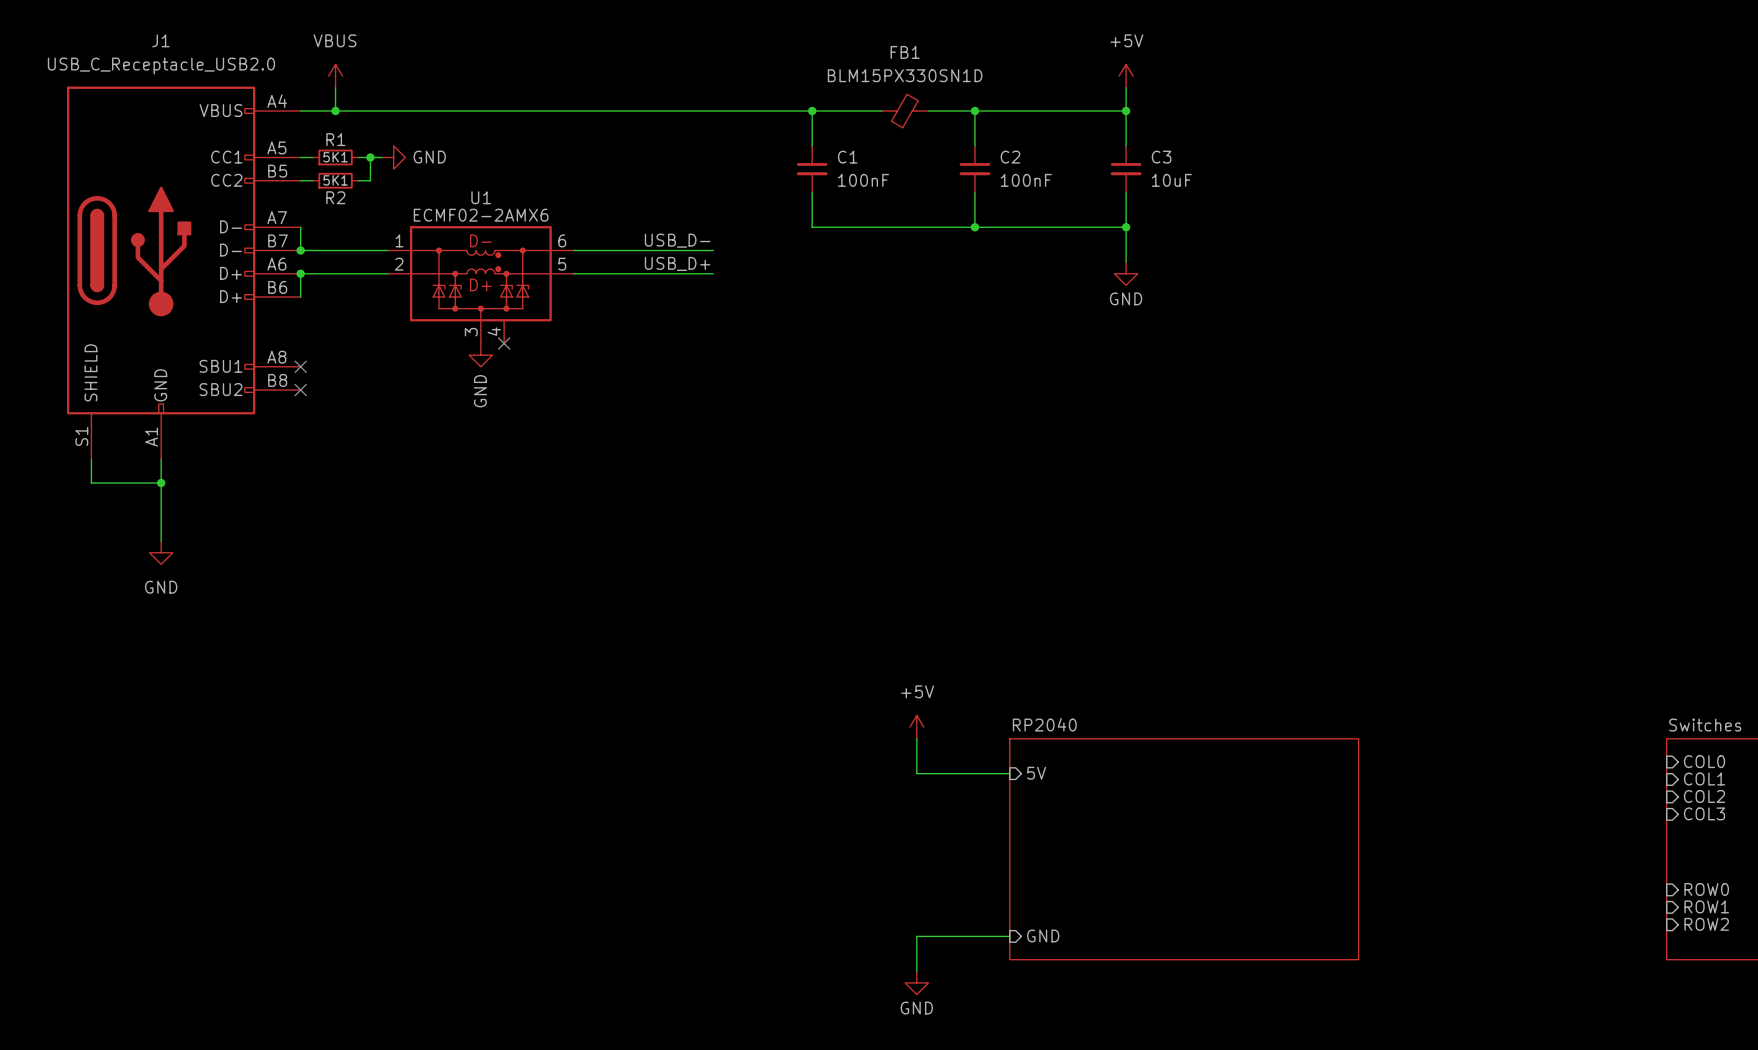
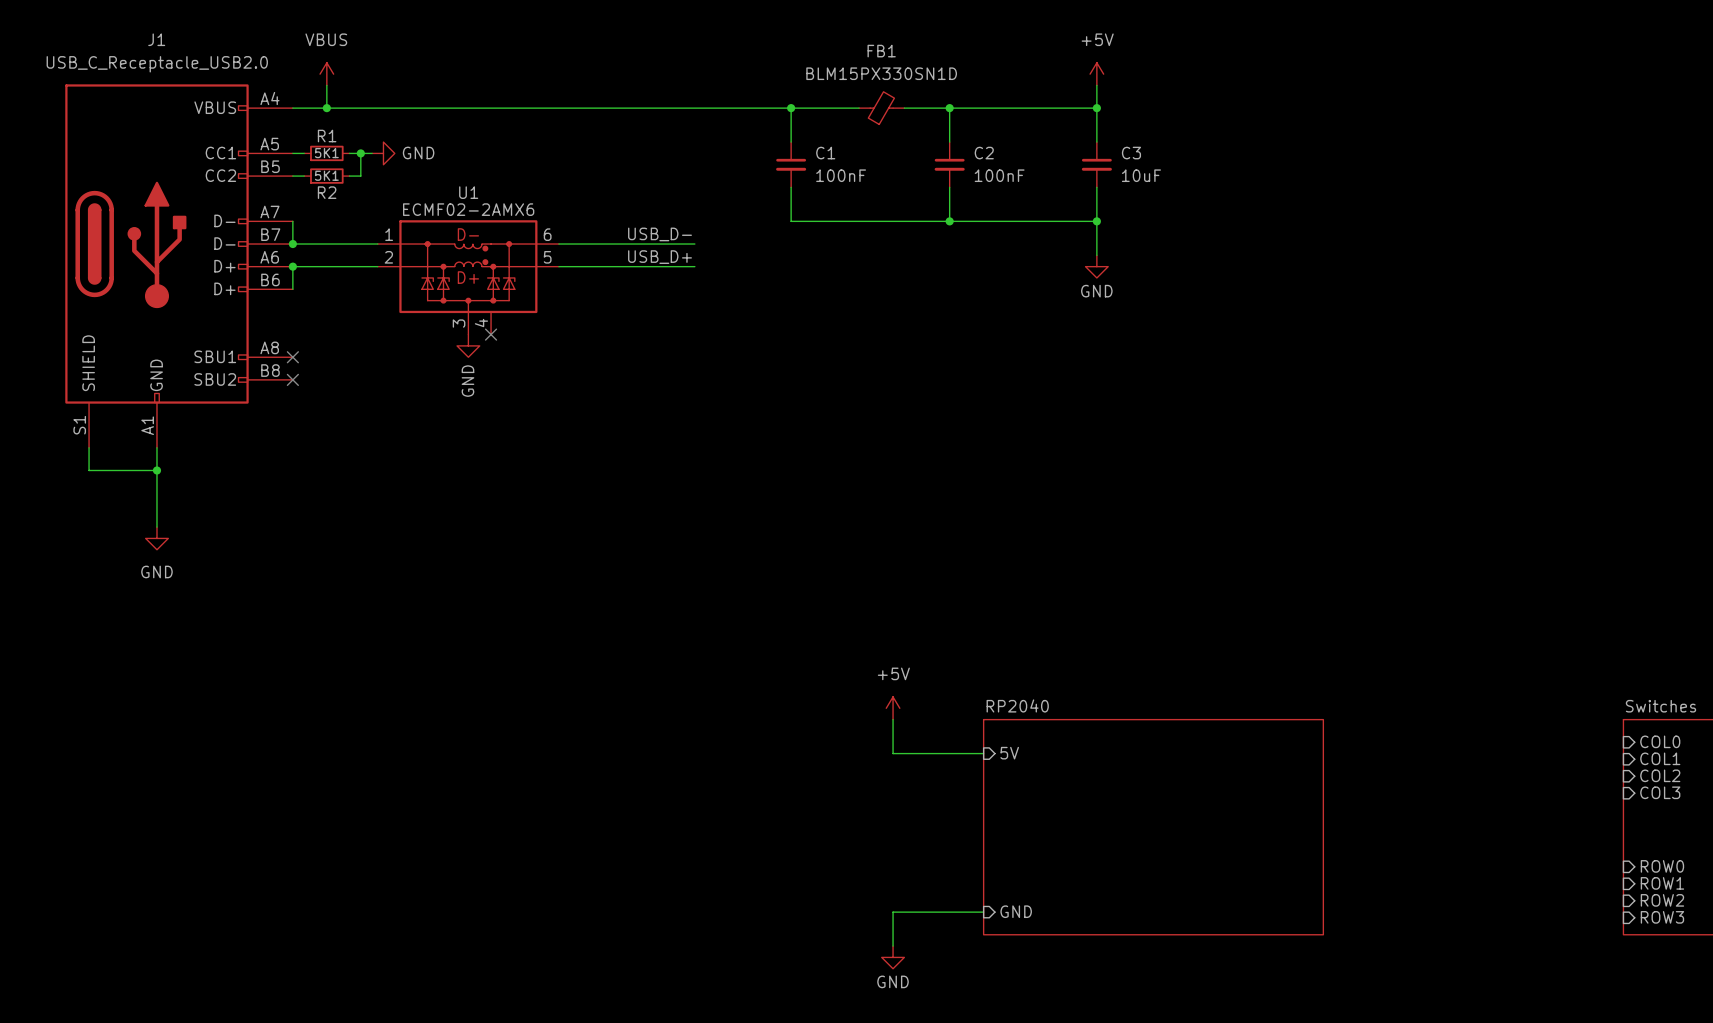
sheet pin: none -> ROW3 (1662, 917)

